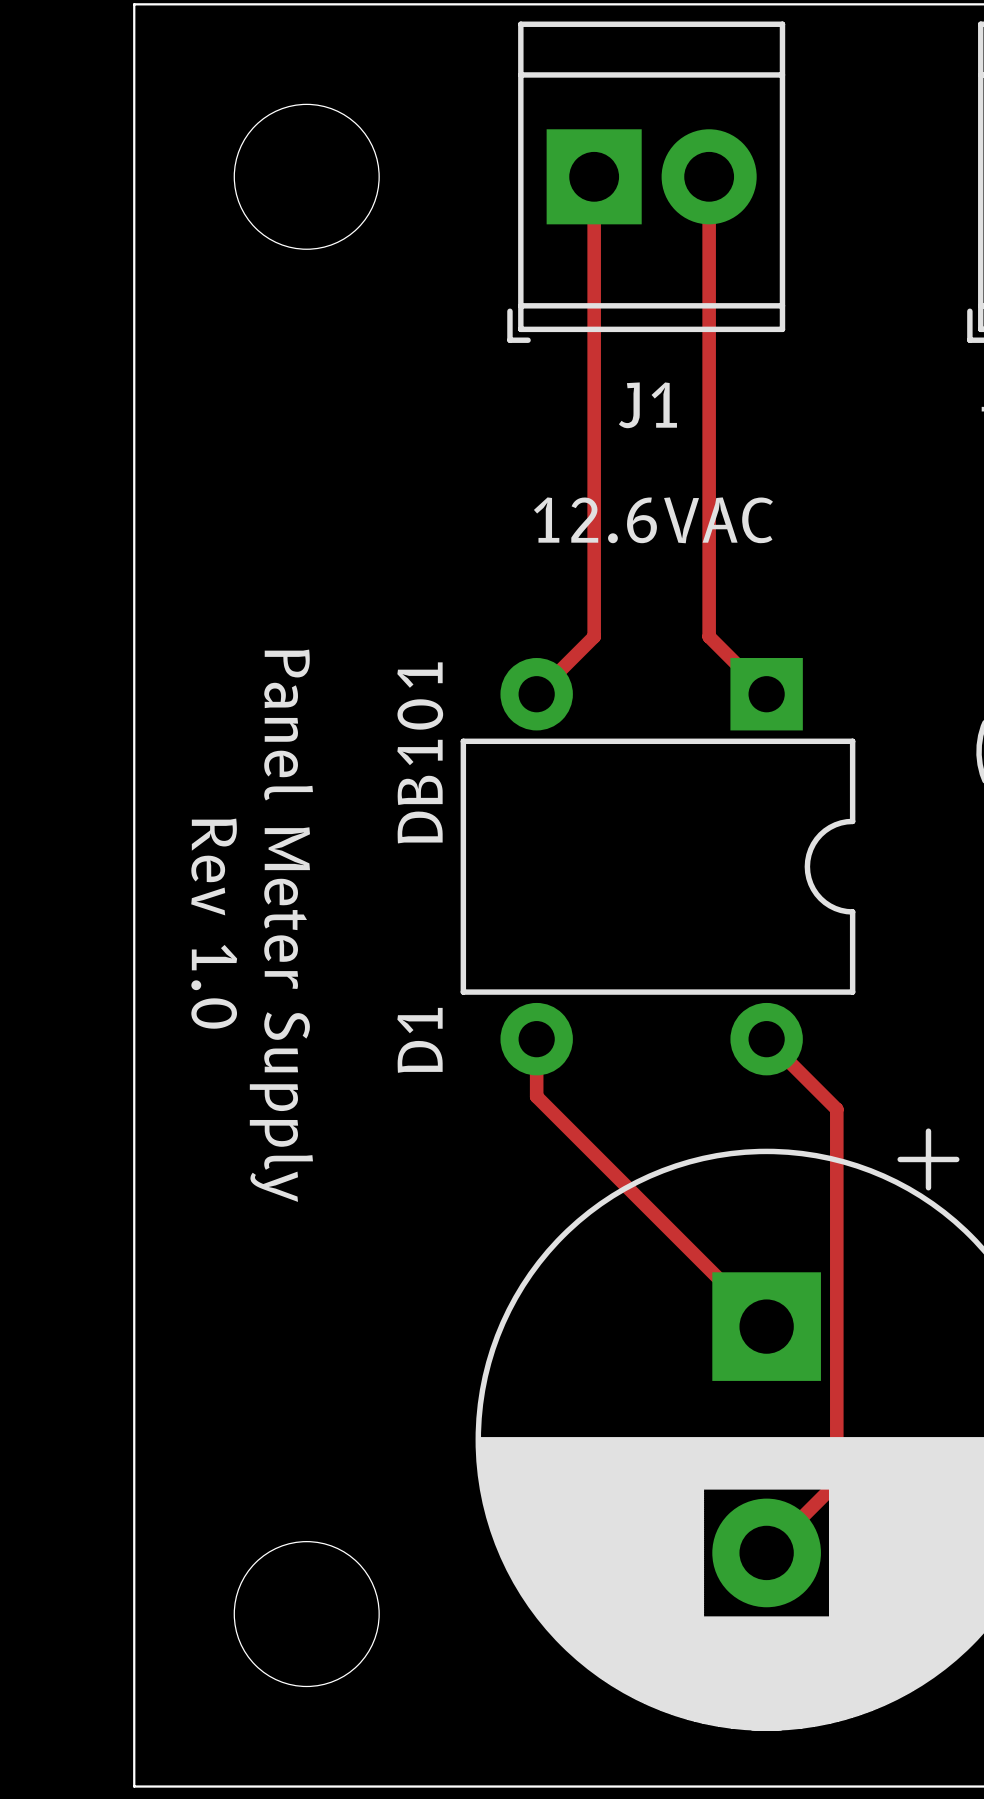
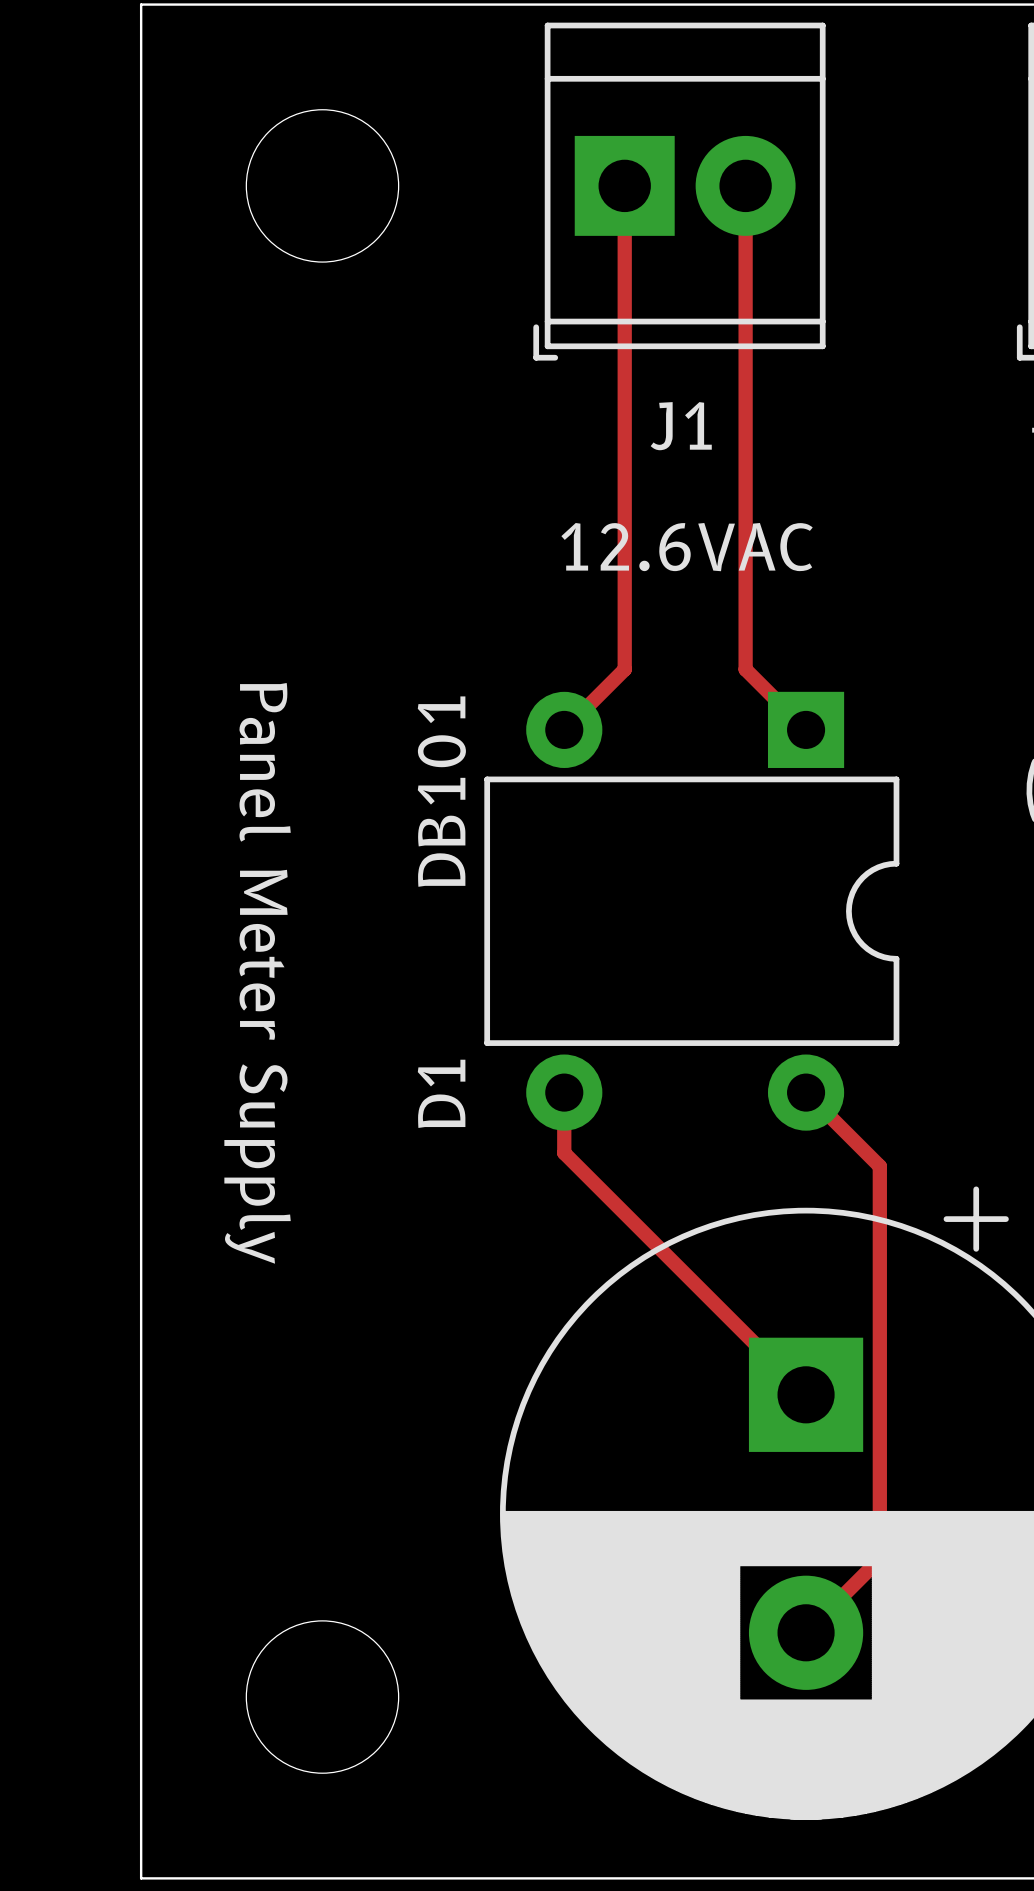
text: Rev 1.0 (214, 923) -> none
text position: Panel Meter Supply (281, 925) -> Panel Meter Supply (257, 973)

